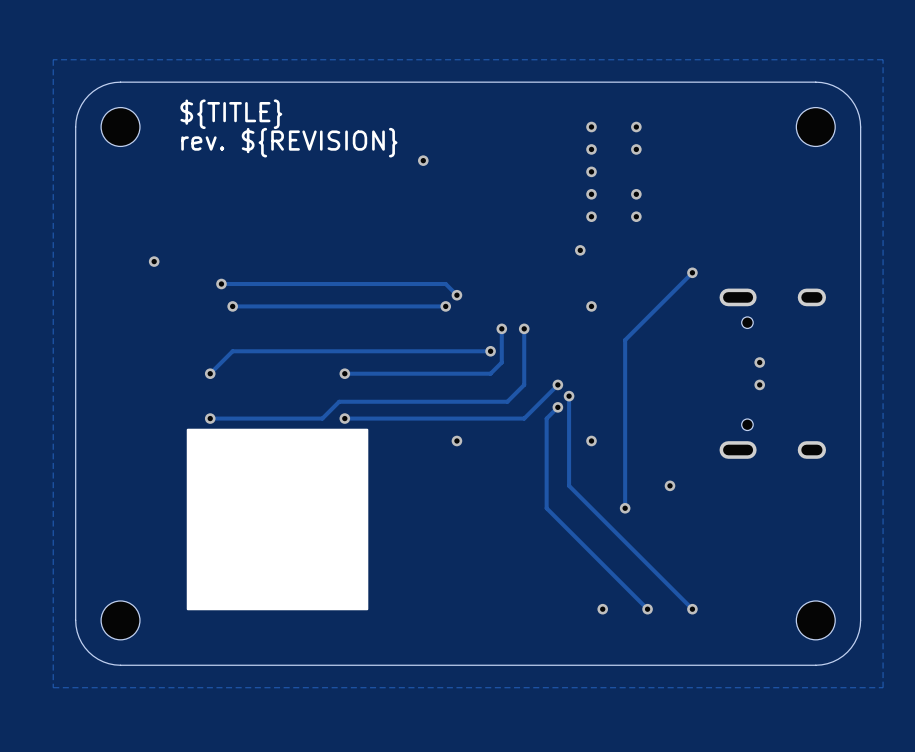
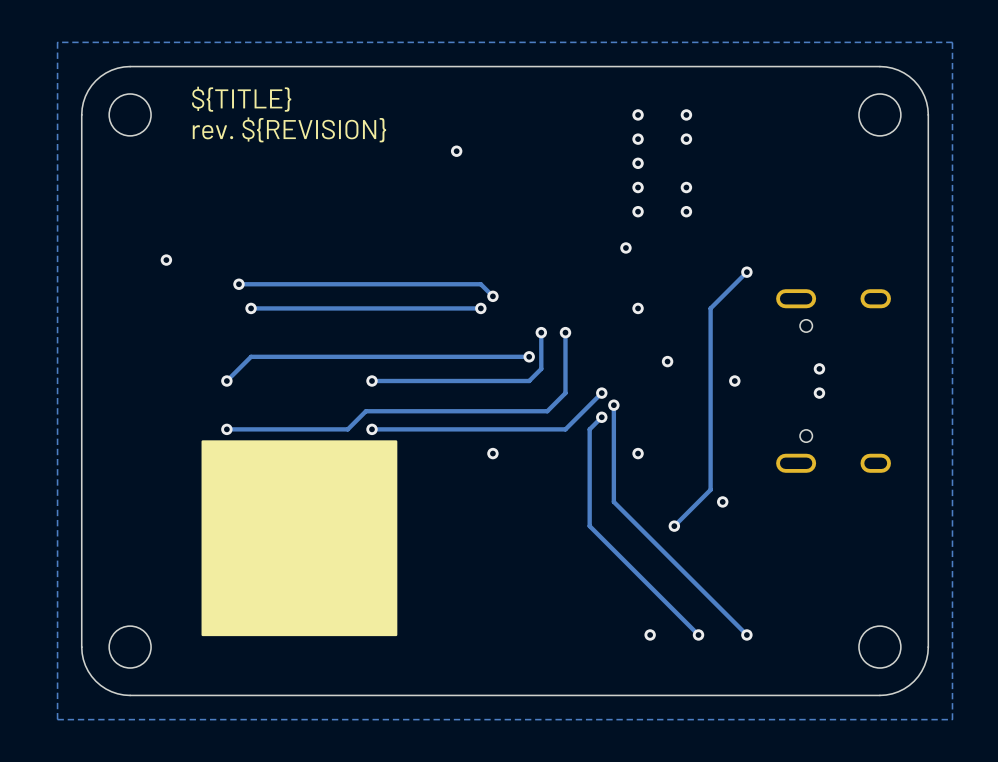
track: (658, 306) (625, 340) (625, 508) -> (710, 308) (710, 489) (674, 526)
via: none -> (667, 361)
via: none -> (734, 381)

